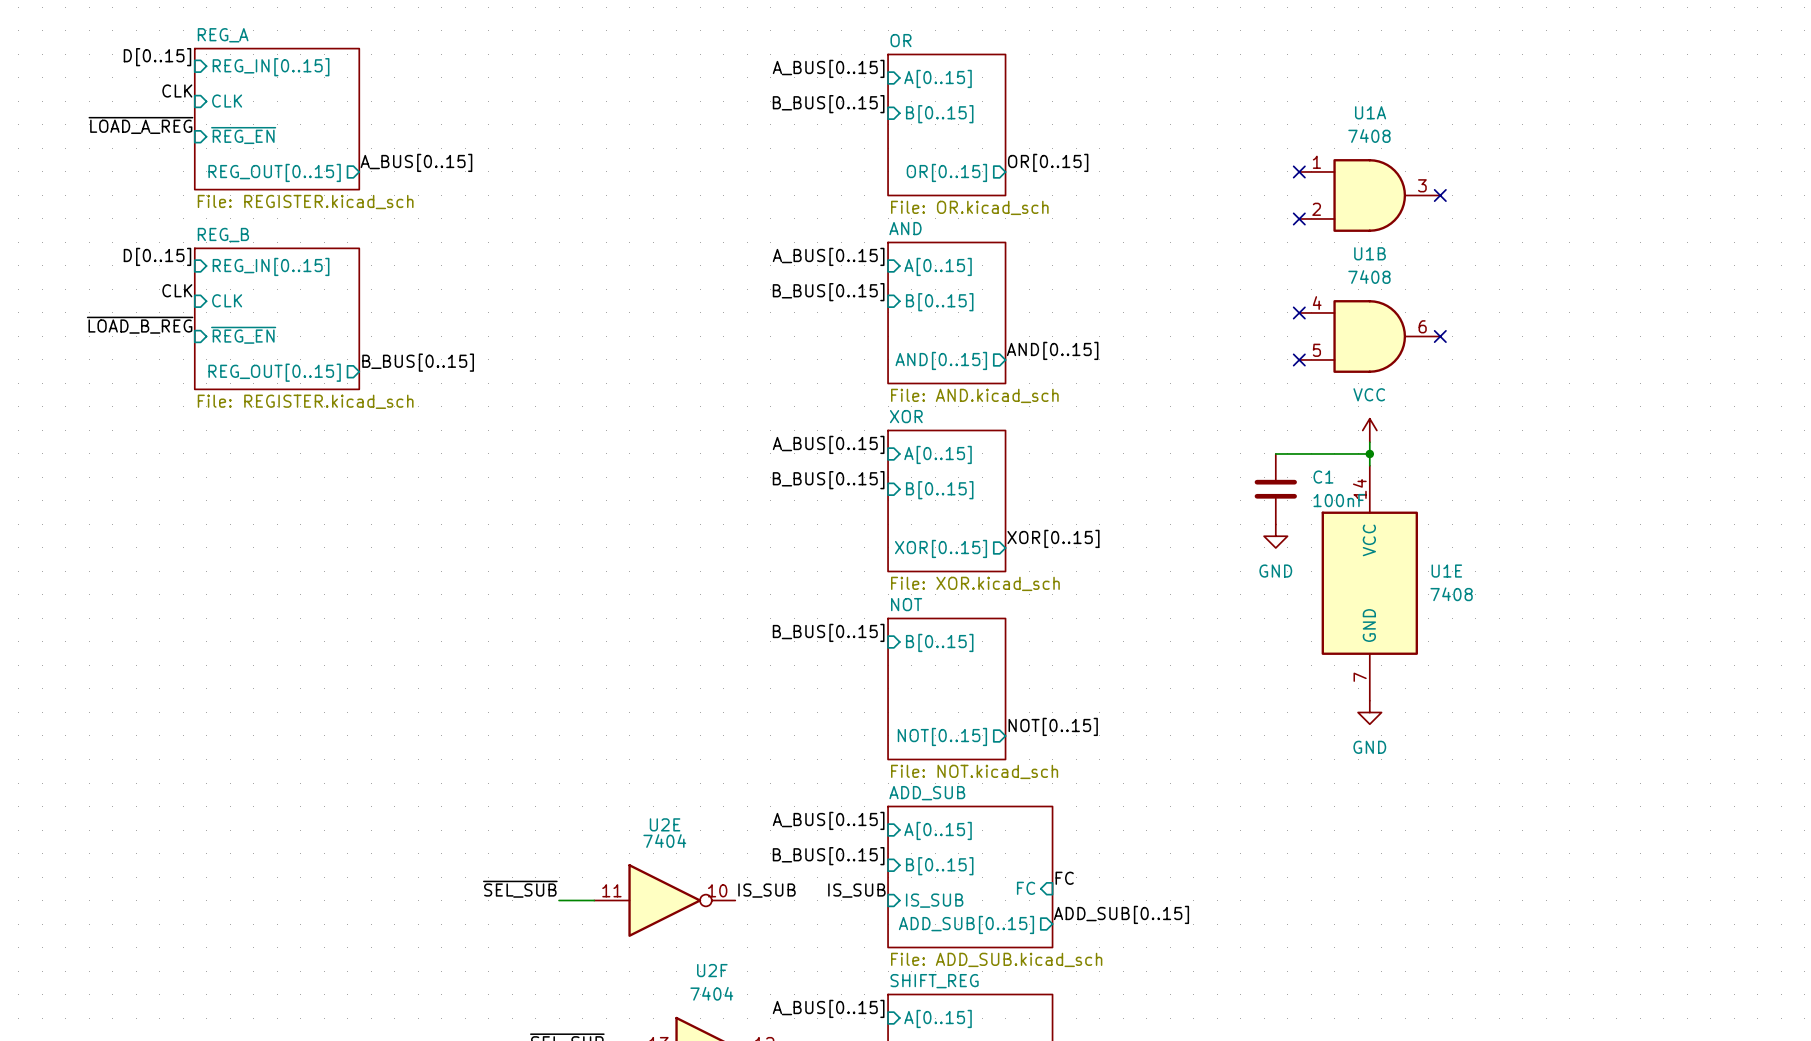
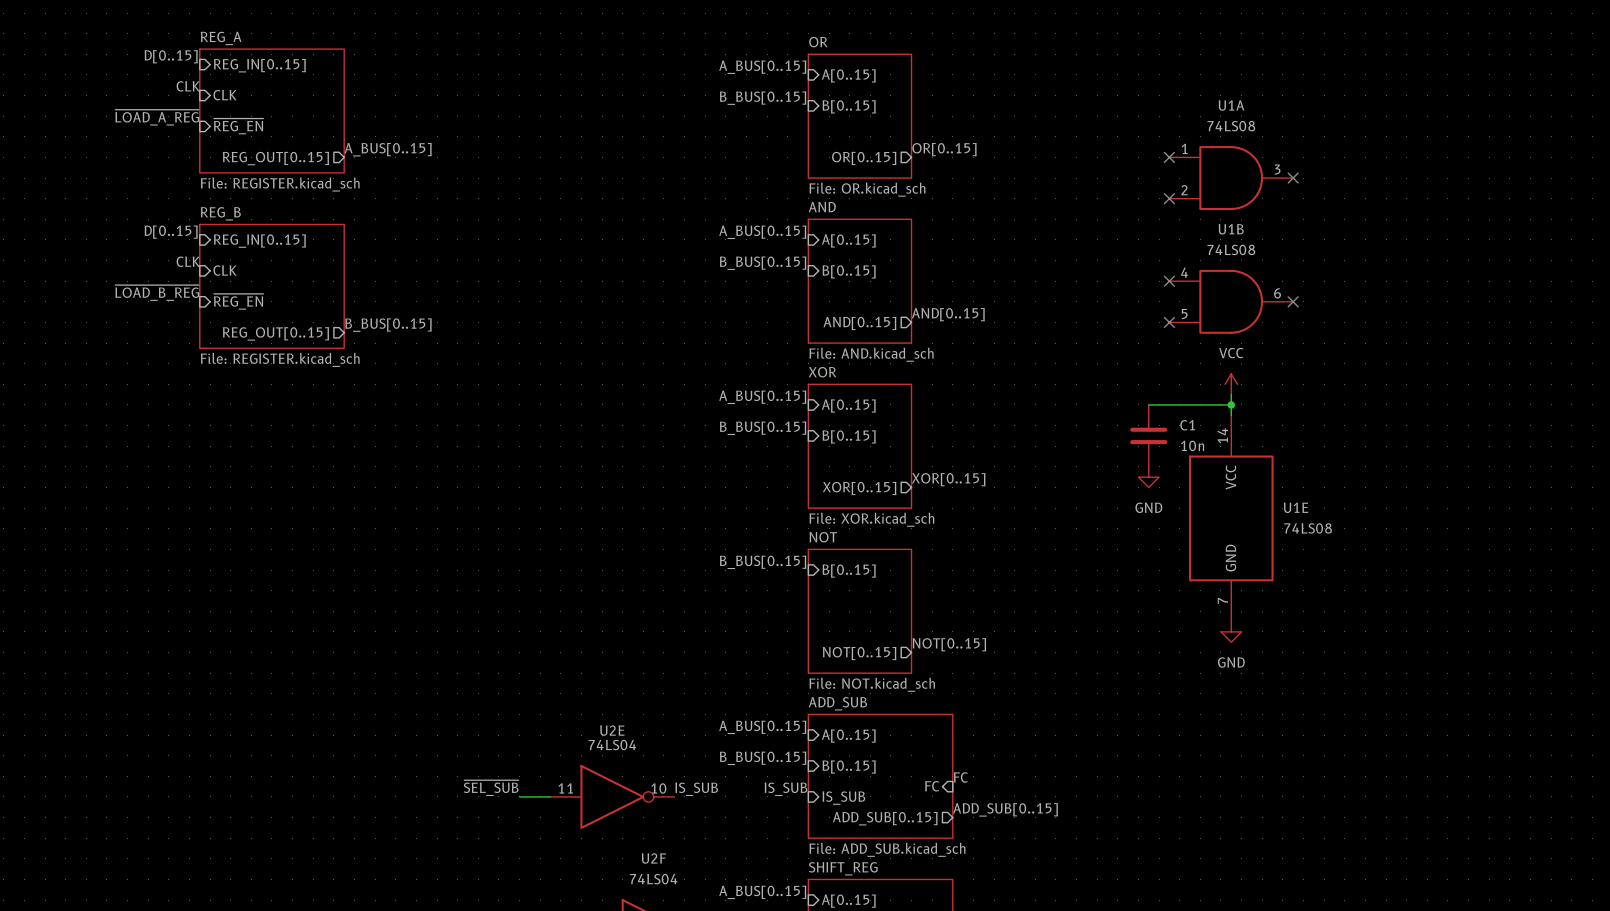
U1A value: 7408 (1369, 136) -> 74LS08 (1231, 126)
U1B value: 7408 (1369, 277) -> 74LS08 (1231, 249)
C1 value: 100nF (1339, 500) -> 10n (1192, 445)
U1E value: 7408 (1451, 594) -> 74LS08 (1308, 528)
U2E value: 7404 (664, 841) -> 74LS04 (612, 745)
U2F value: 7404 (711, 993) -> 74LS04 (653, 879)

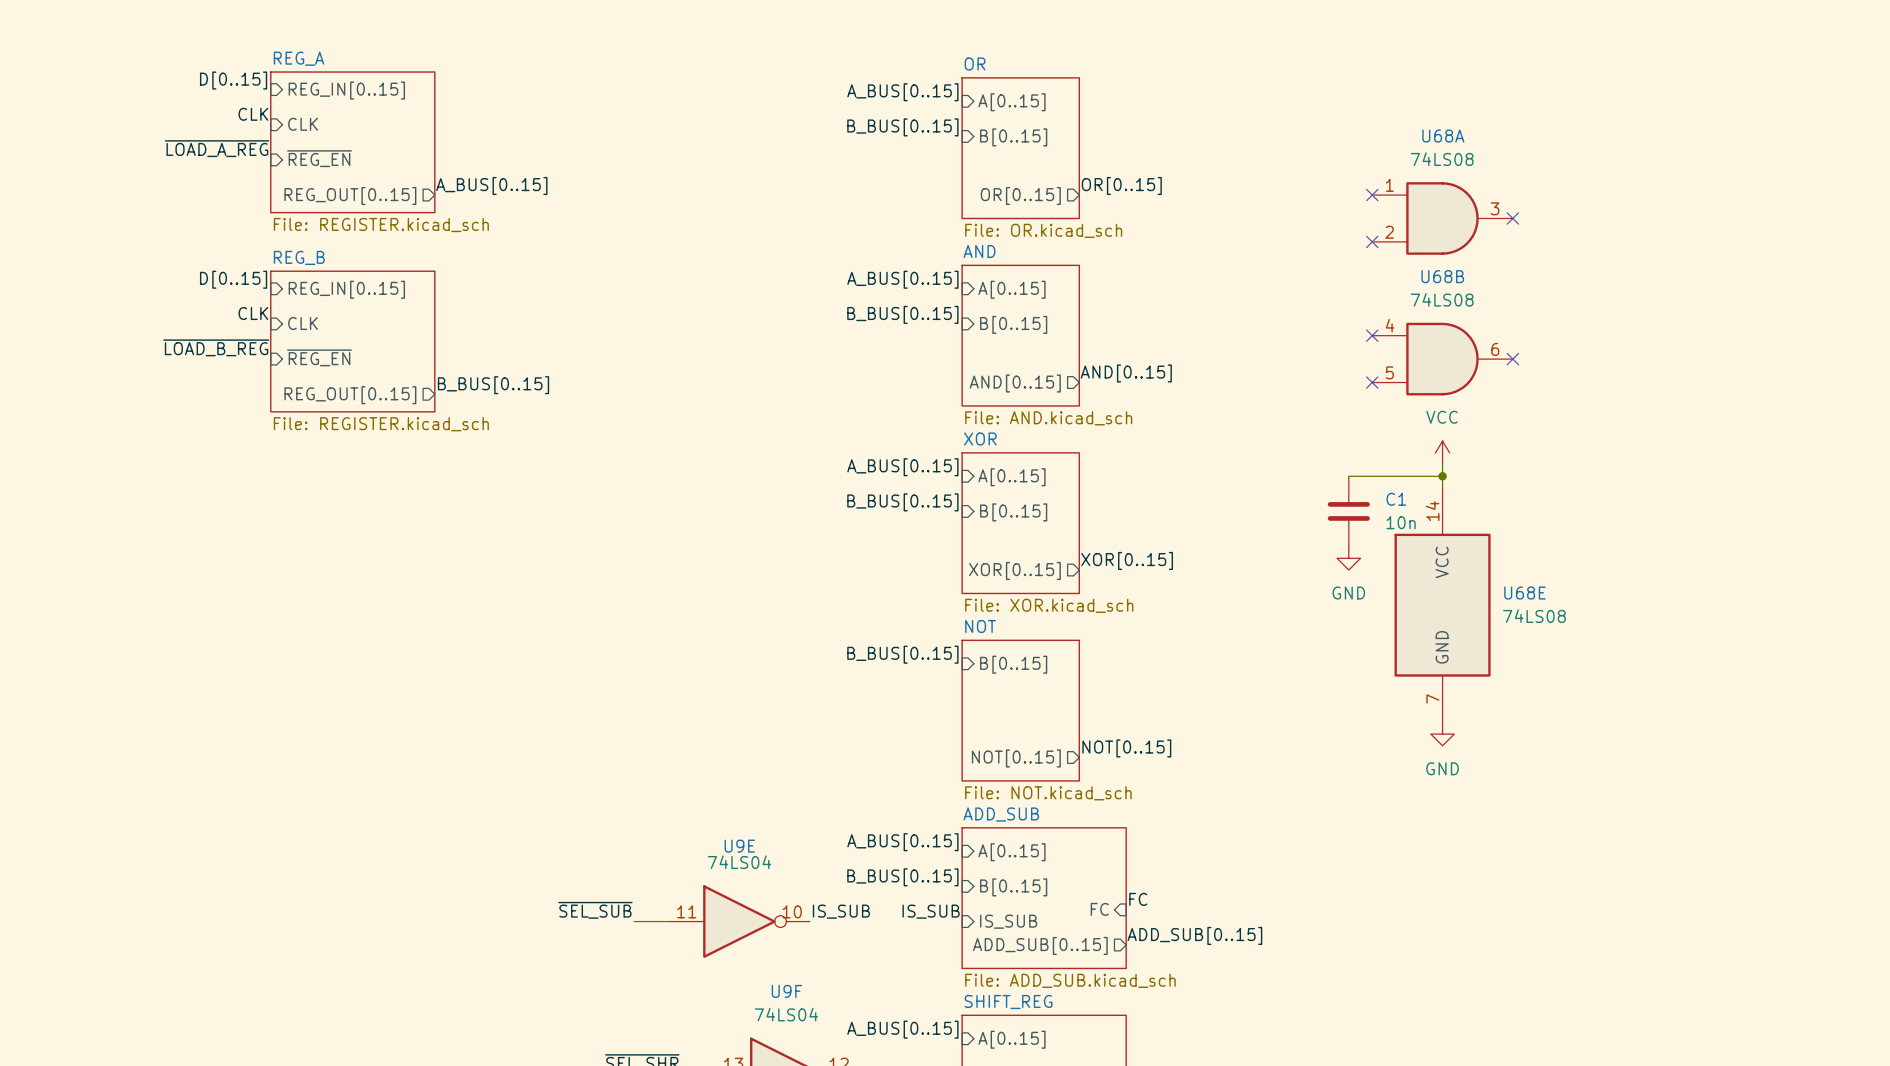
U1A name: U1A (1231, 105) -> U68A (1443, 136)
U1B name: U1B (1231, 229) -> U68B (1442, 276)
U1E name: U1E (1296, 507) -> U68E (1524, 593)
U2E name: U2E (612, 730) -> U9E (739, 846)
U2F name: U2F (653, 858) -> U9F (786, 991)

